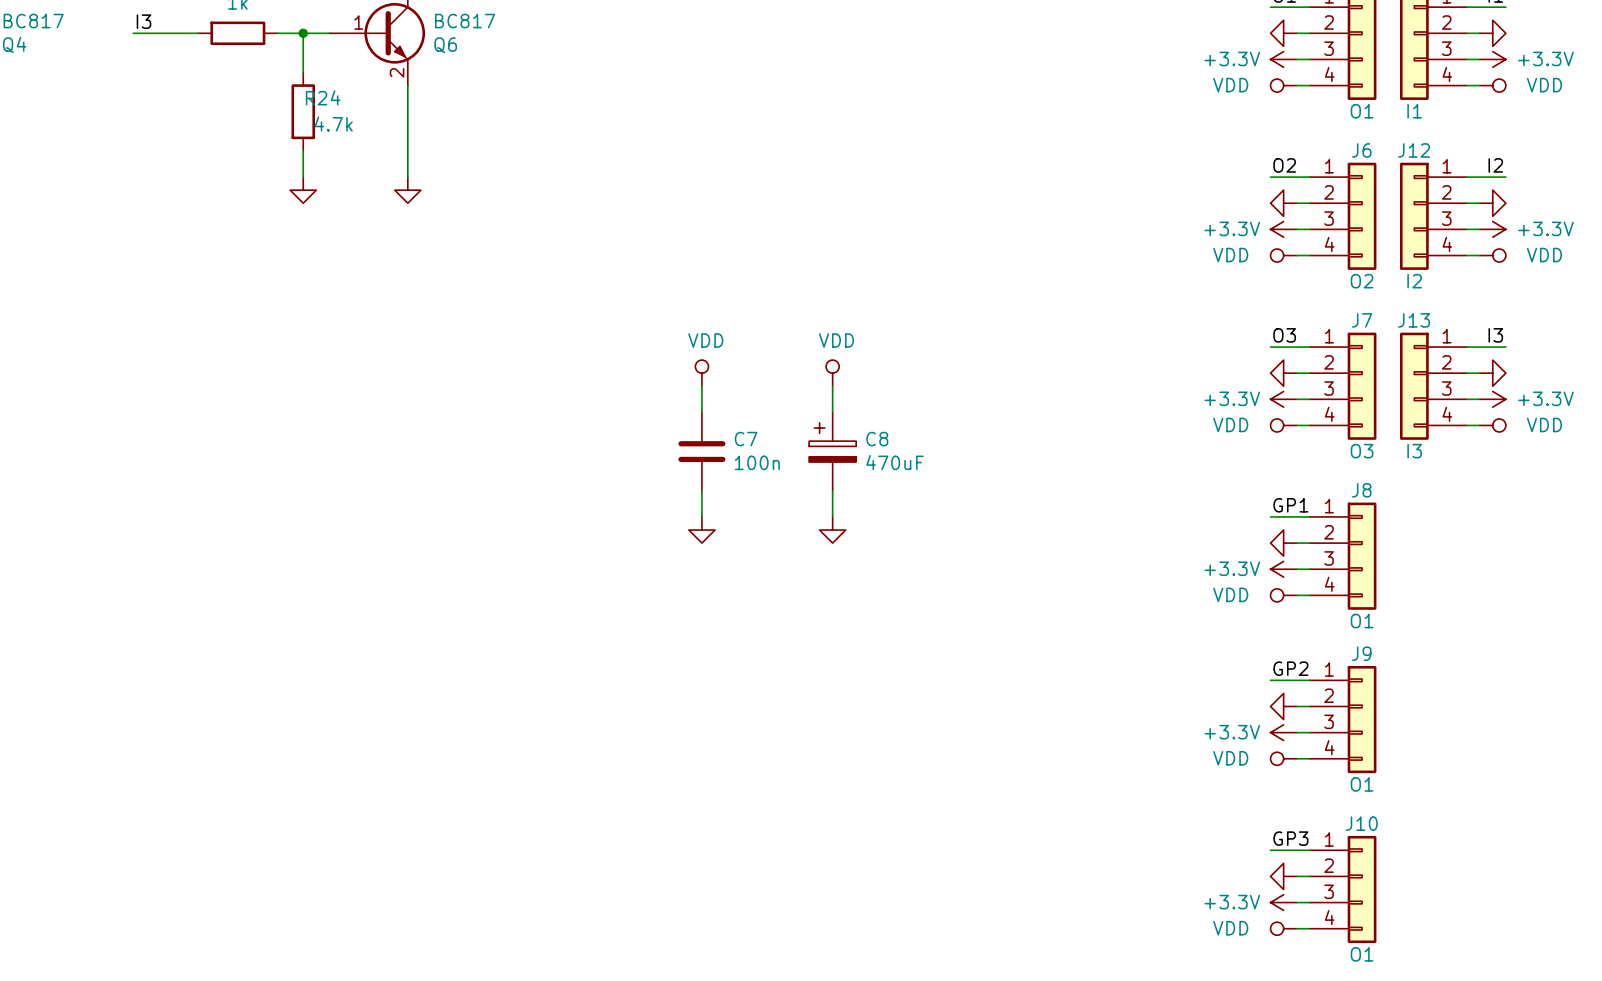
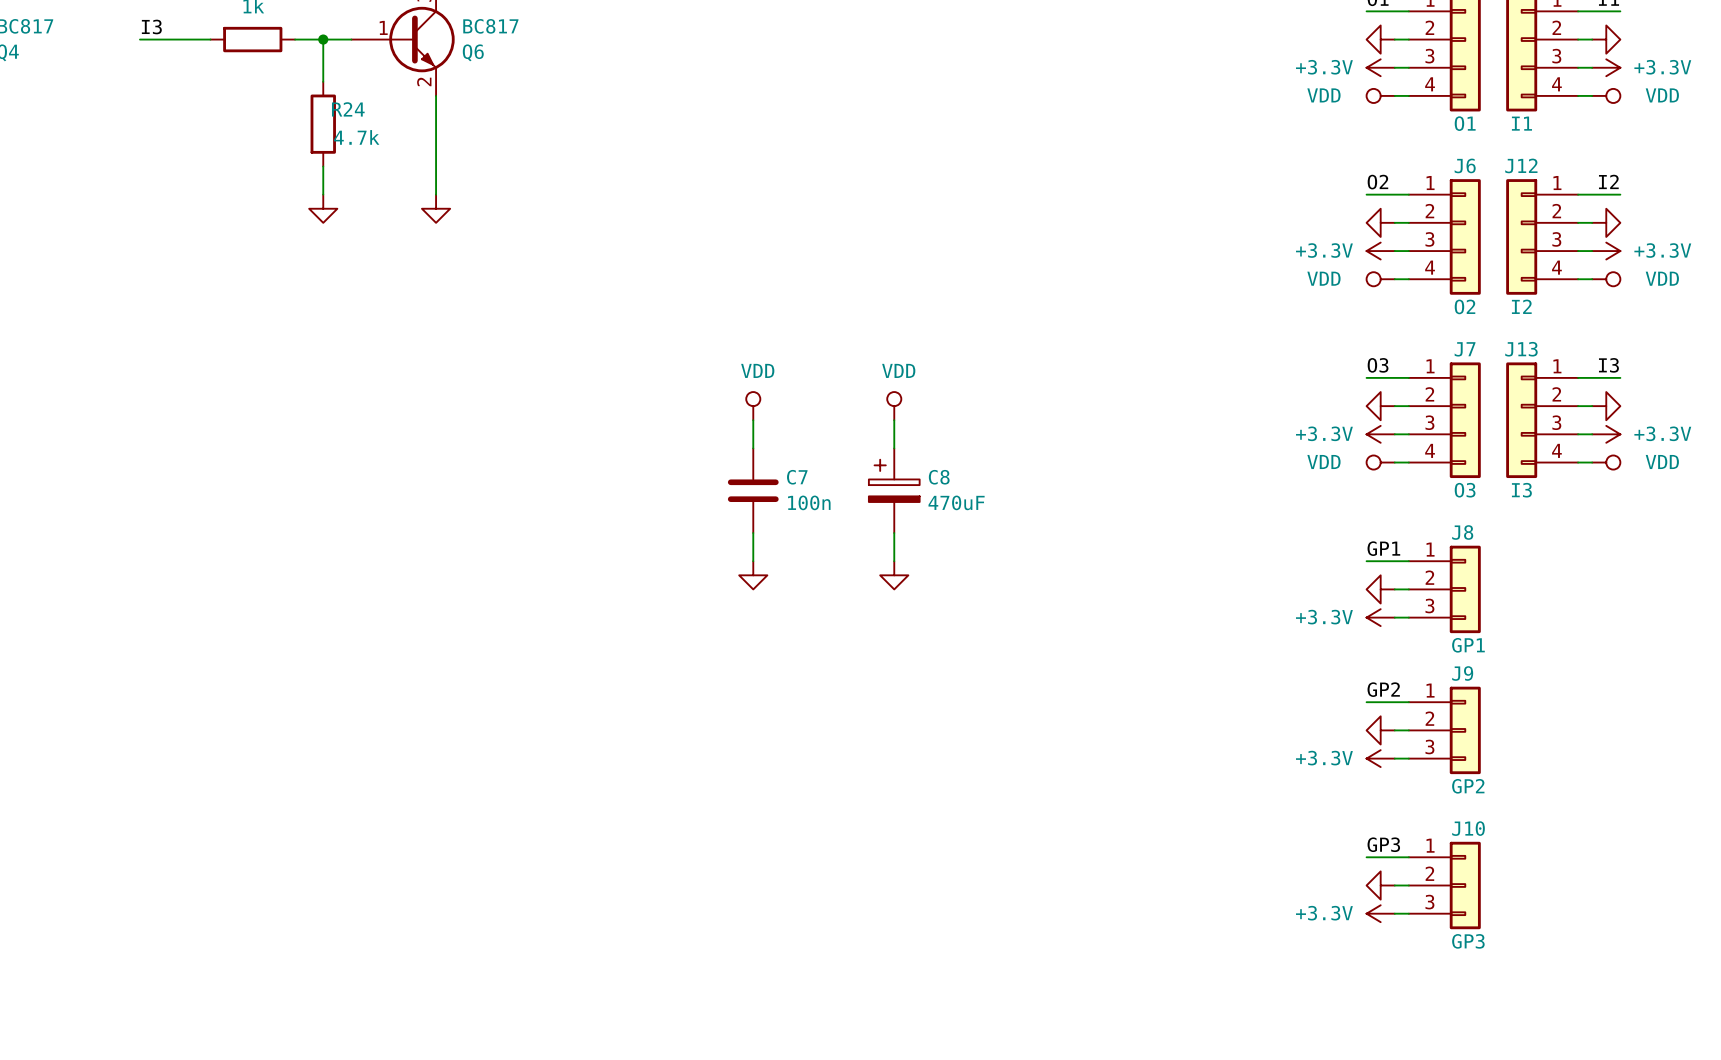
J8 symbol: [1309, 502, 1377, 610] -> [1408, 545, 1481, 634]
power symbol: VDD (1283, 595) -> none
wire: (1296, 595) (1309, 595) -> none
J8 value: O1 (1362, 621) -> GP1 (1468, 645)
J9 symbol: [1309, 665, 1377, 774] -> [1408, 686, 1481, 775]
label position: GP2 (1290, 668) -> GP2 (1383, 689)
power symbol: none -> (1380, 730)
wire: (1270, 680) (1309, 680) -> (1366, 702) (1408, 702)
power symbol shape: [1270, 693, 1297, 720] -> [1366, 750, 1395, 768]
power symbol text: none -> +3.3V (1324, 758)
wire: (1296, 706) (1309, 706) -> none
power symbol: +3.3V (1283, 732) -> none
wire: (1296, 732) (1309, 732) -> (1394, 730) (1408, 730)
power symbol: VDD (1283, 758) -> none
wire: (1296, 758) (1309, 758) -> (1394, 758) (1408, 758)
J9 value: O1 (1362, 784) -> GP2 (1468, 786)
J10 symbol: [1309, 835, 1377, 944] -> [1408, 841, 1481, 930]
label position: GP3 (1290, 838) -> GP3 (1383, 844)
power symbol: none -> +3.3V (1380, 913)
wire: (1270, 850) (1309, 850) -> (1366, 857) (1408, 857)
power symbol position: (1283, 876) -> (1380, 885)
wire: (1296, 876) (1309, 876) -> (1394, 885) (1408, 885)
power symbol: +3.3V (1283, 902) -> none
wire: (1296, 902) (1309, 902) -> (1394, 913) (1408, 913)
power symbol: VDD (1283, 928) -> none
wire: (1296, 928) (1309, 928) -> none
J10 value: O1 (1362, 954) -> GP3 (1468, 941)

